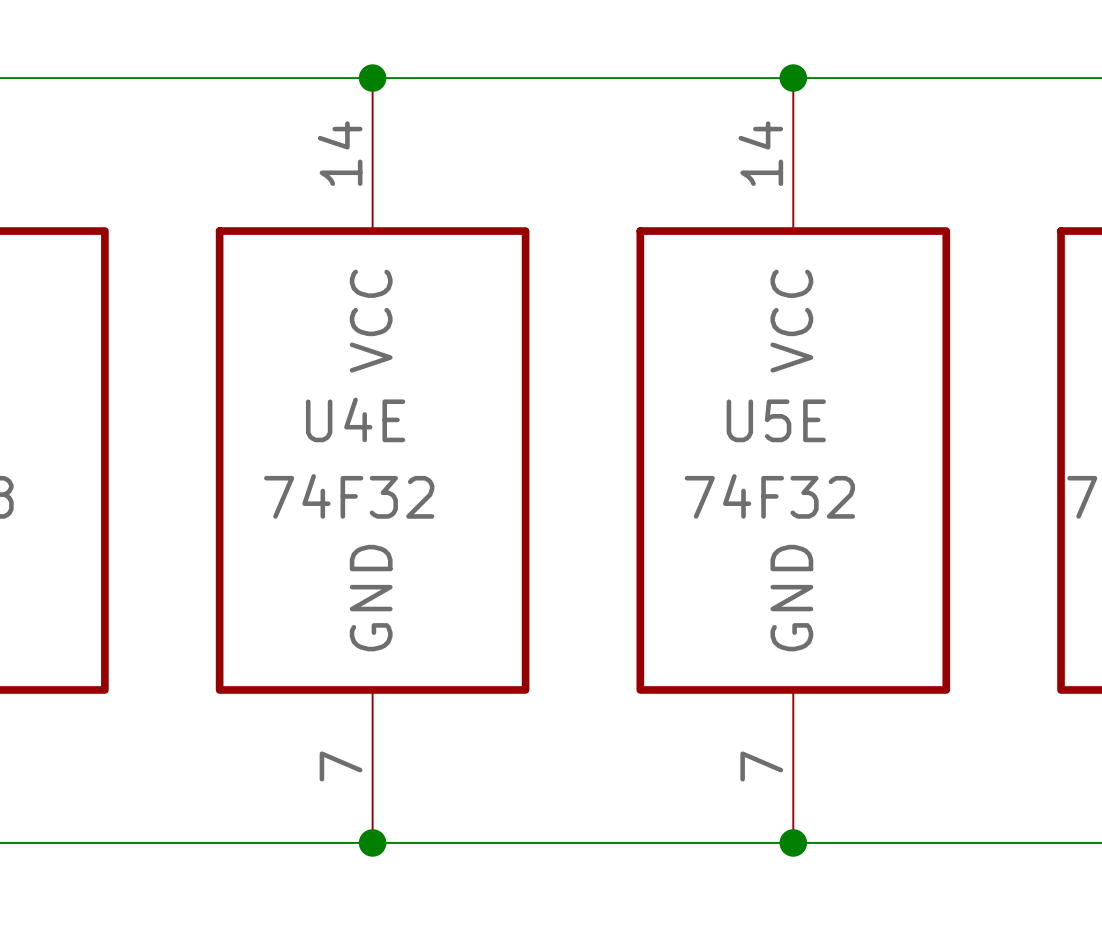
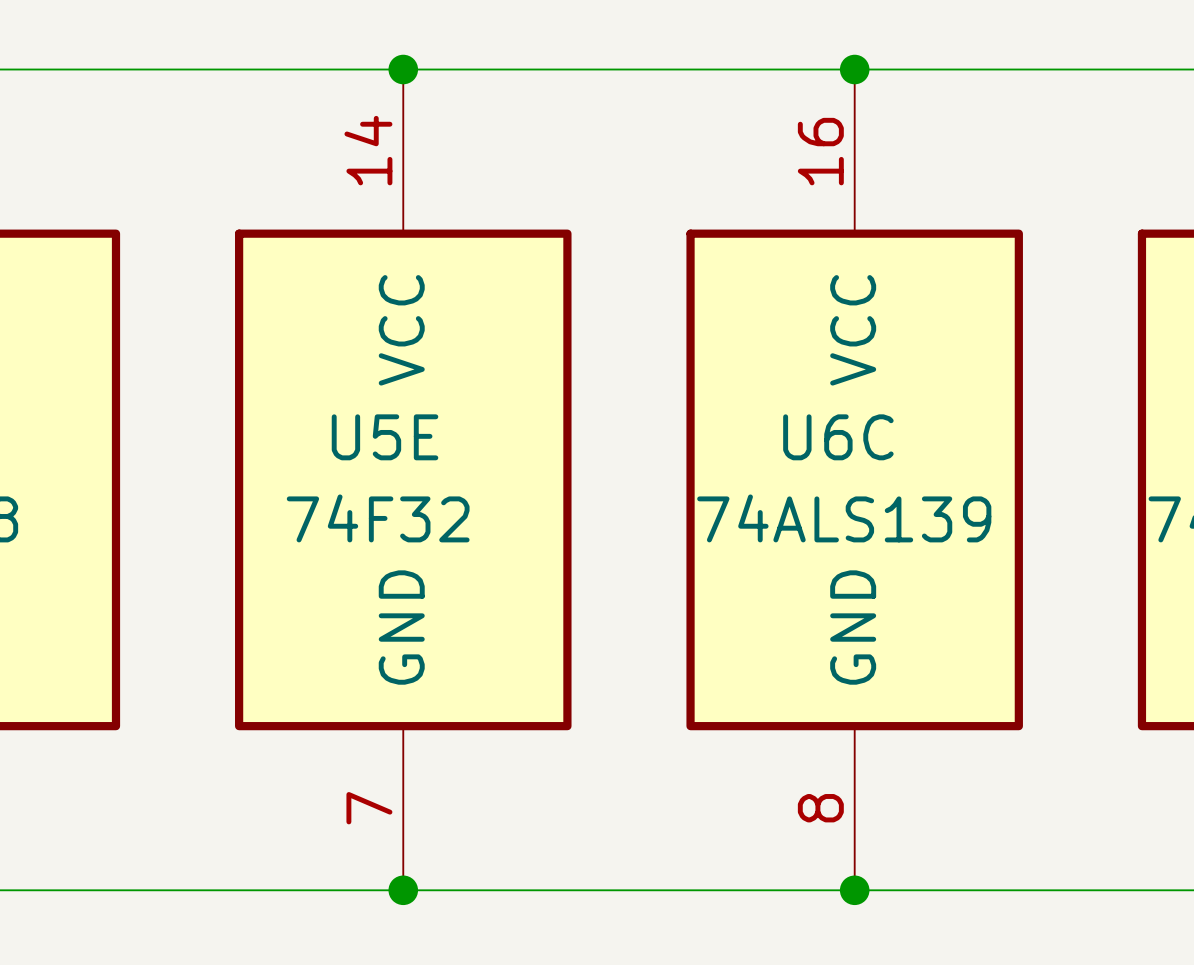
U5E pin number: 14 (760, 153) -> 16 (820, 151)
U4E name: U4E (355, 419) -> U5E (385, 437)
U5E name: U5E (776, 420) -> U6C (838, 437)
U5E value: 74F32 (769, 496) -> 74ALS139 (844, 518)
U5E pin number: 7 (761, 766) -> 8 (820, 808)

